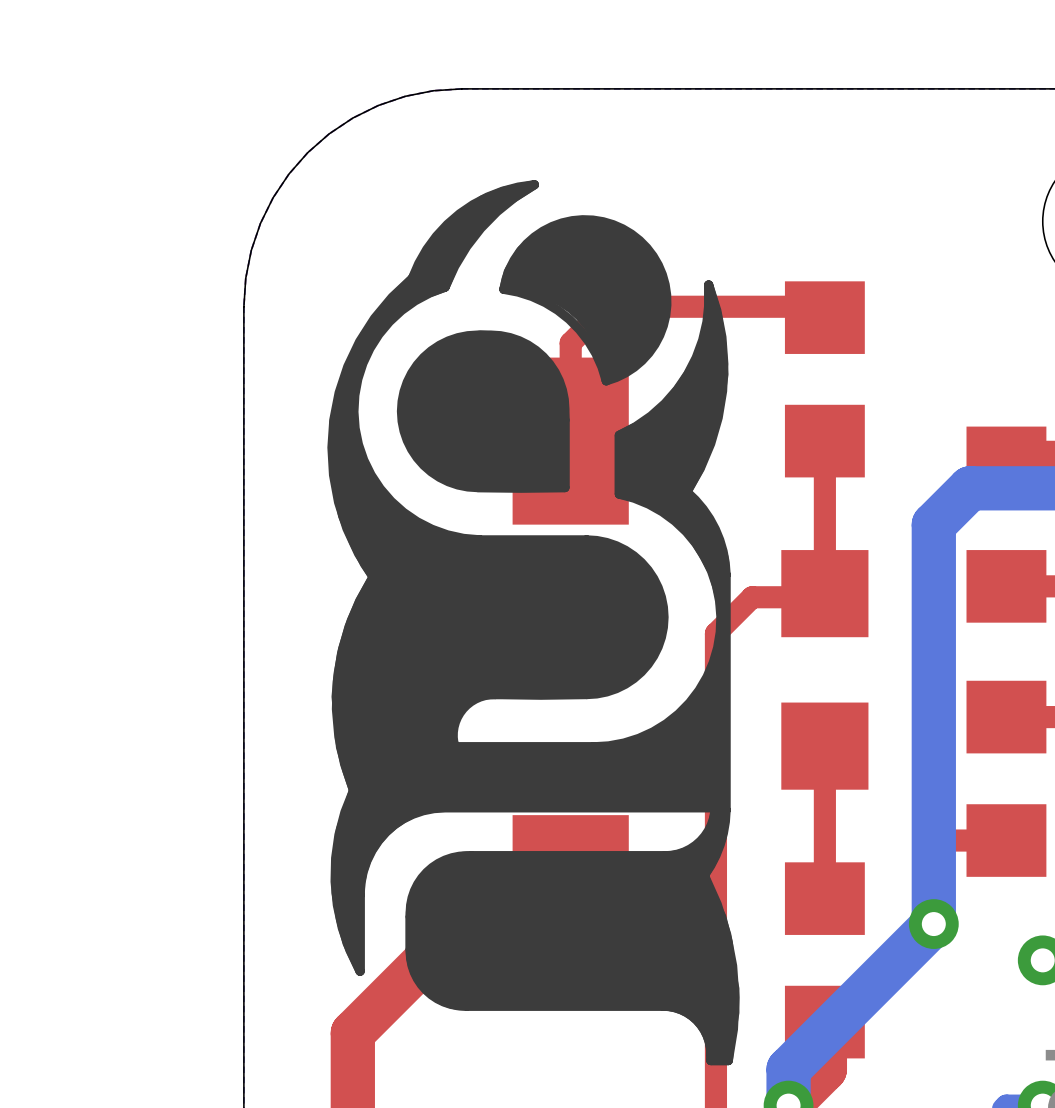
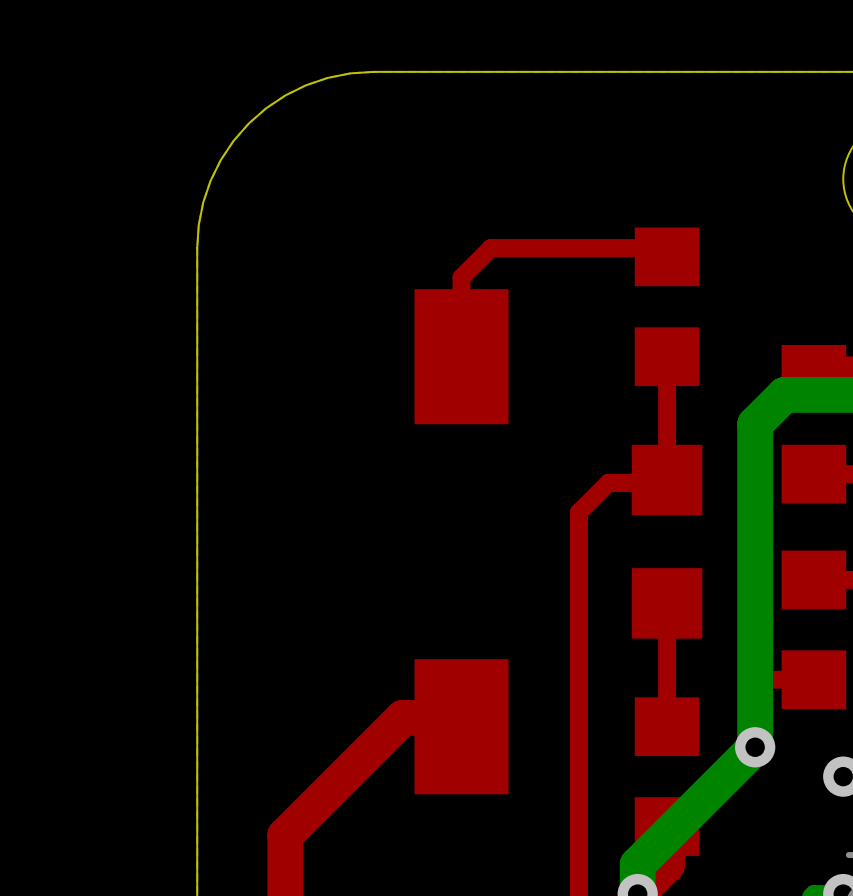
drawing: [327, 180, 740, 1066] -> none

